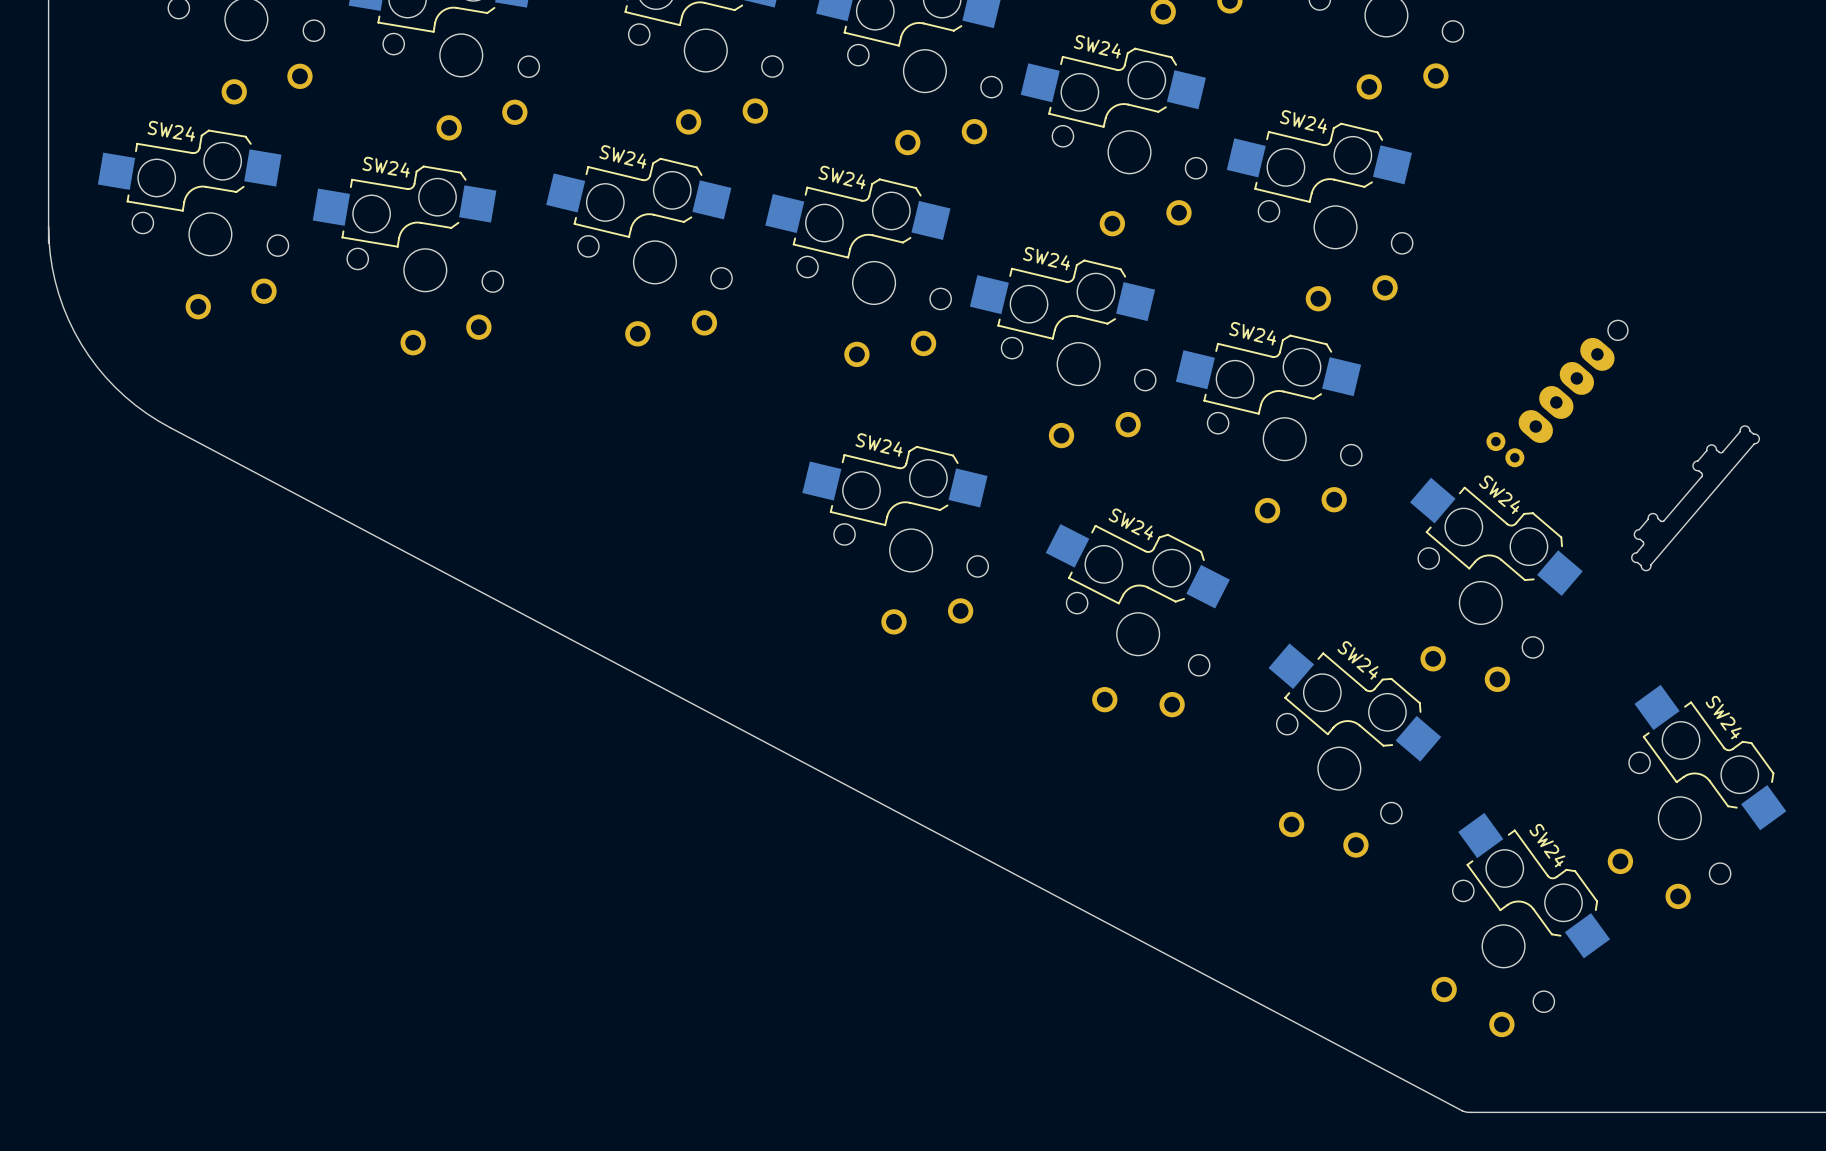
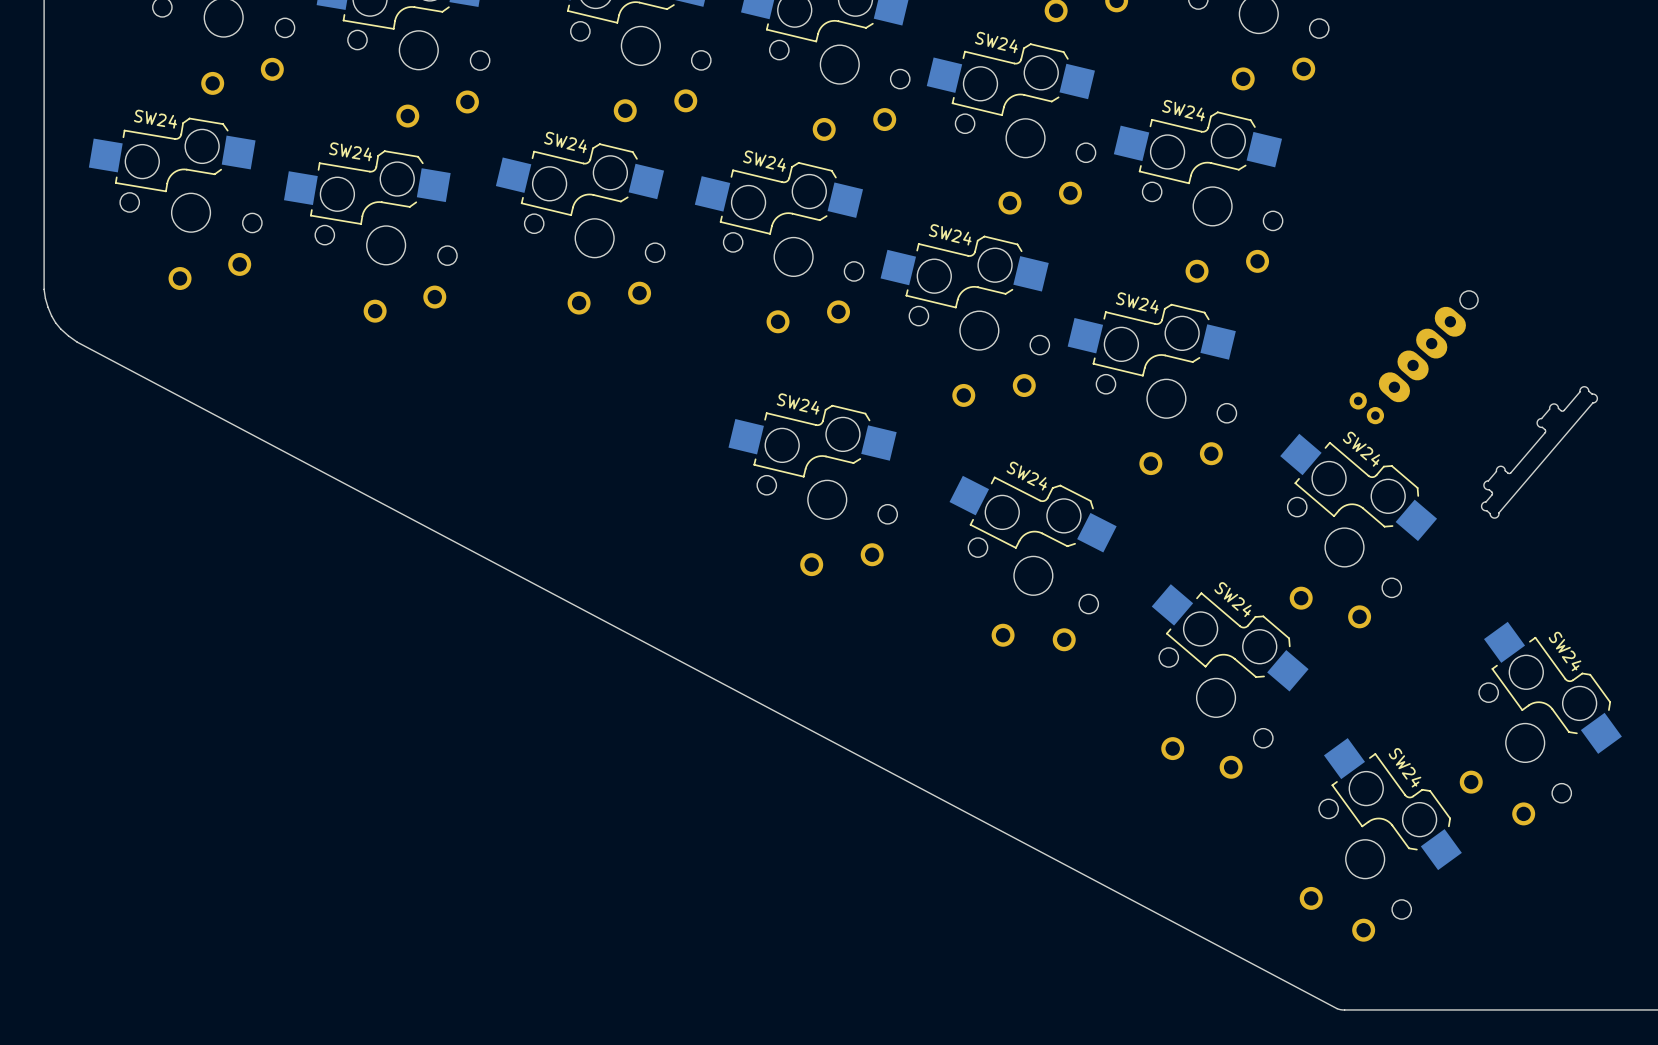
board edge: (48, 226) (50, 254) (55, 281) (63, 307) (74, 332) (88, 355) (105, 377) (135, 405) (158, 420) (1462, 1110) (1480, 1112) -> (44, 220) (45, 298) (55, 322) (77, 342) (1337, 1008) (1344, 1009)

